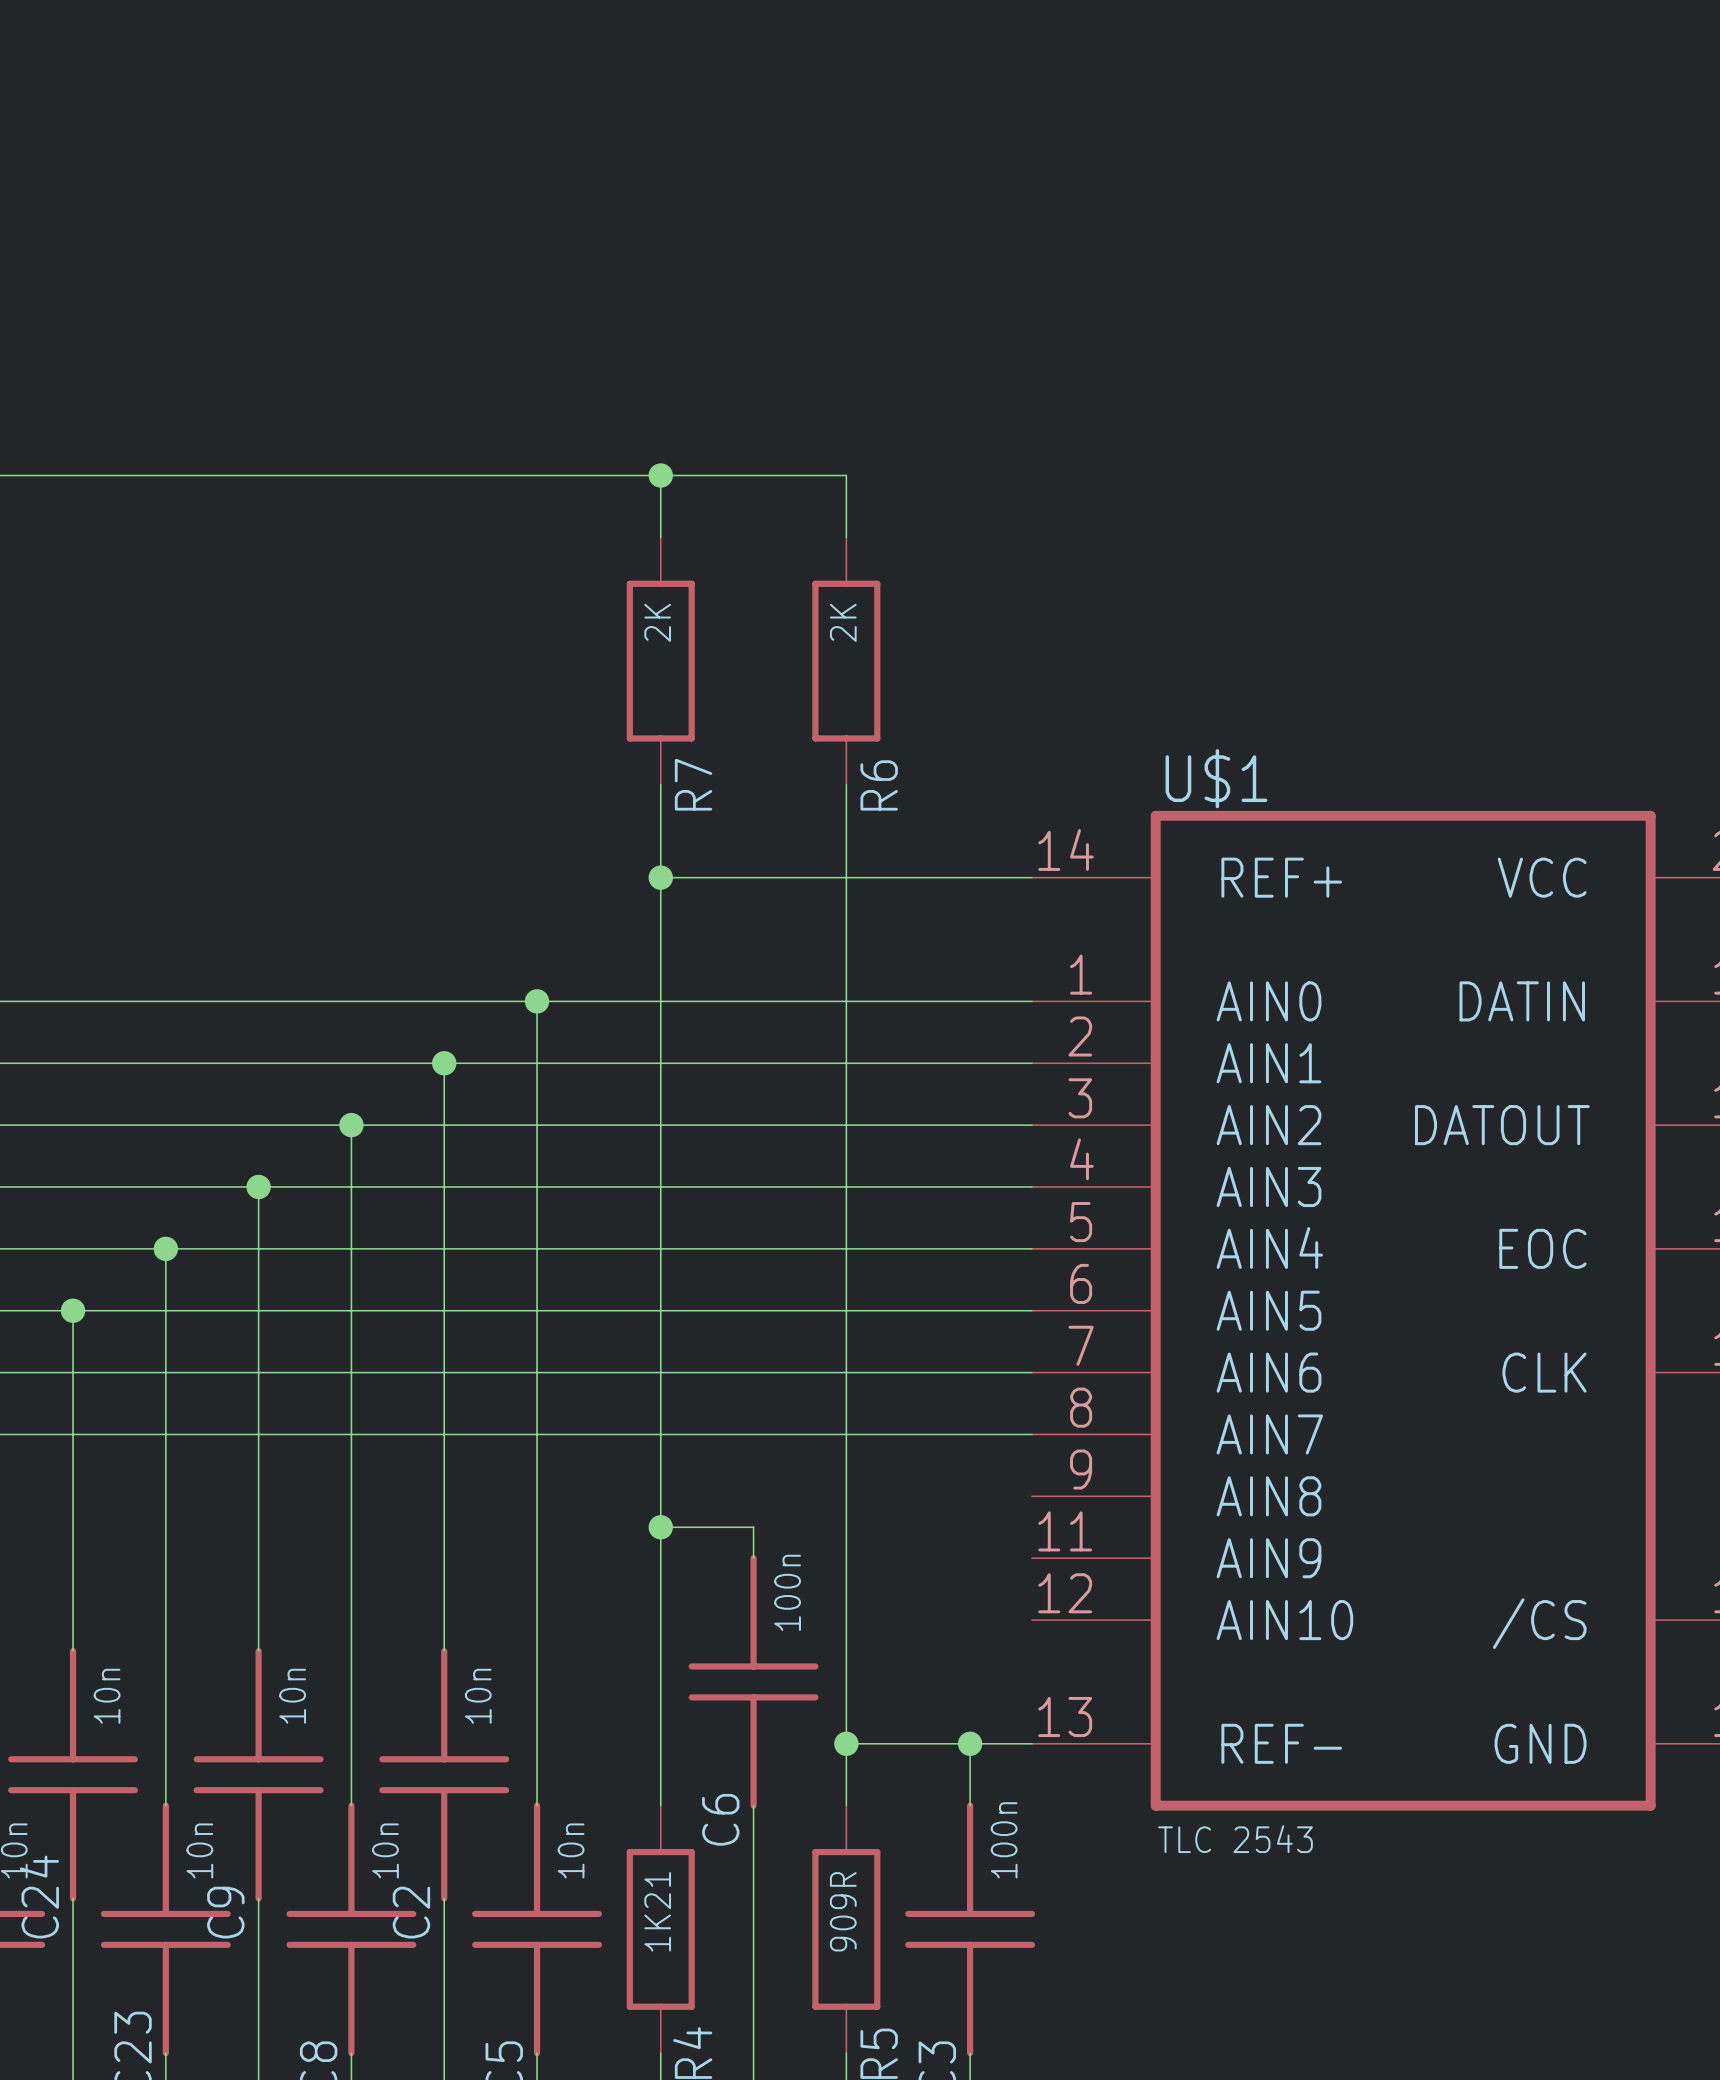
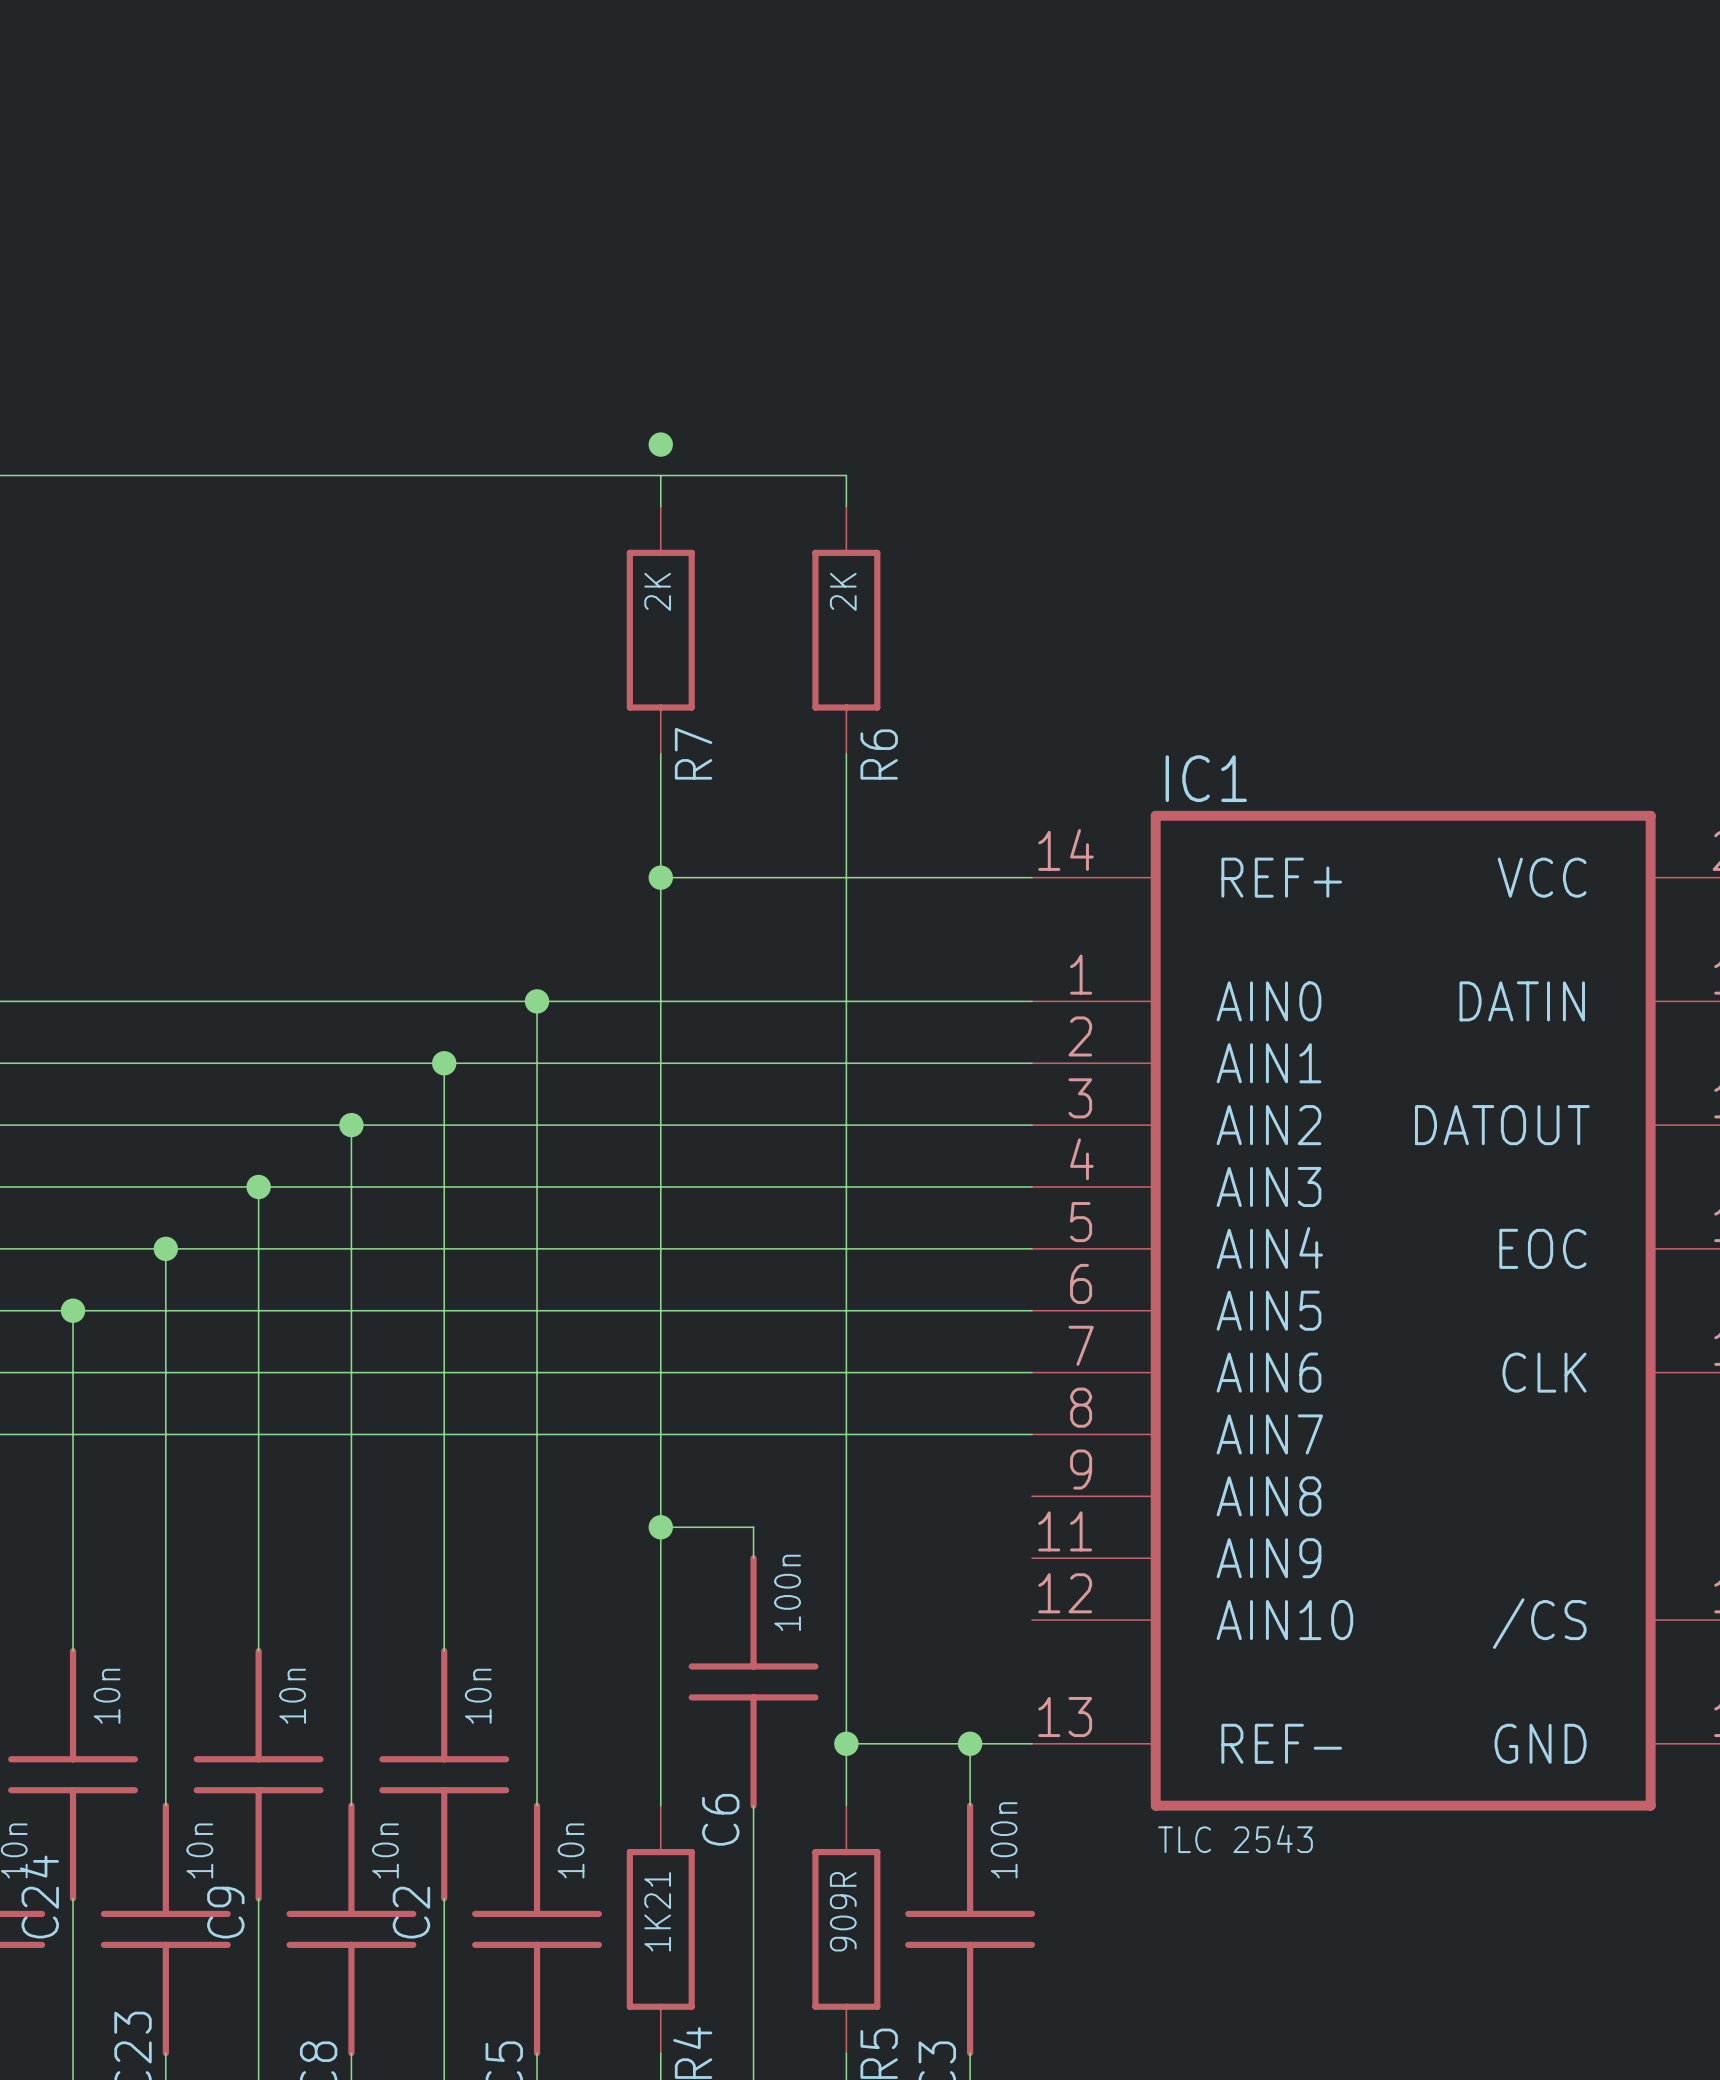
junction position: (660, 475) -> (660, 444)
R7 position: (660, 661) -> (660, 630)
R6 position: (846, 661) -> (846, 630)
U$1 name: U$1 (1216, 778) -> IC1 (1206, 778)

